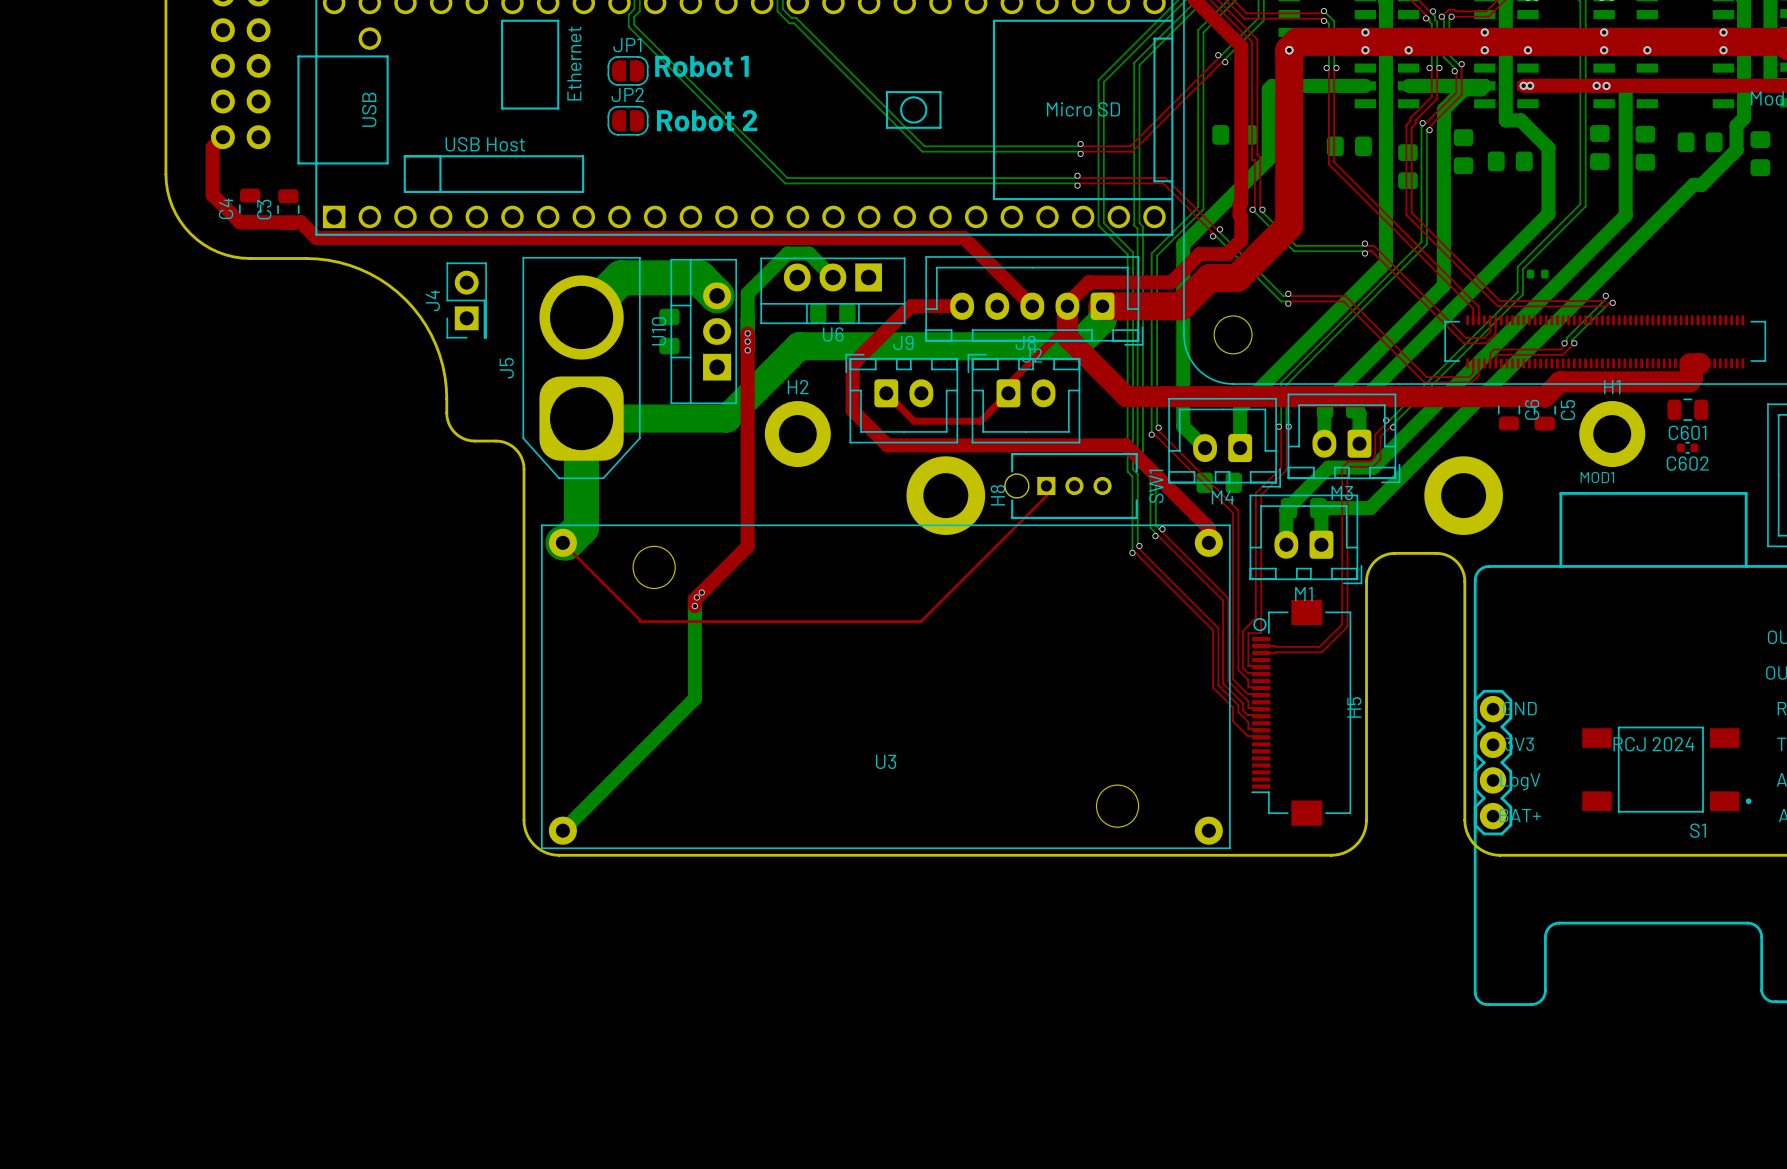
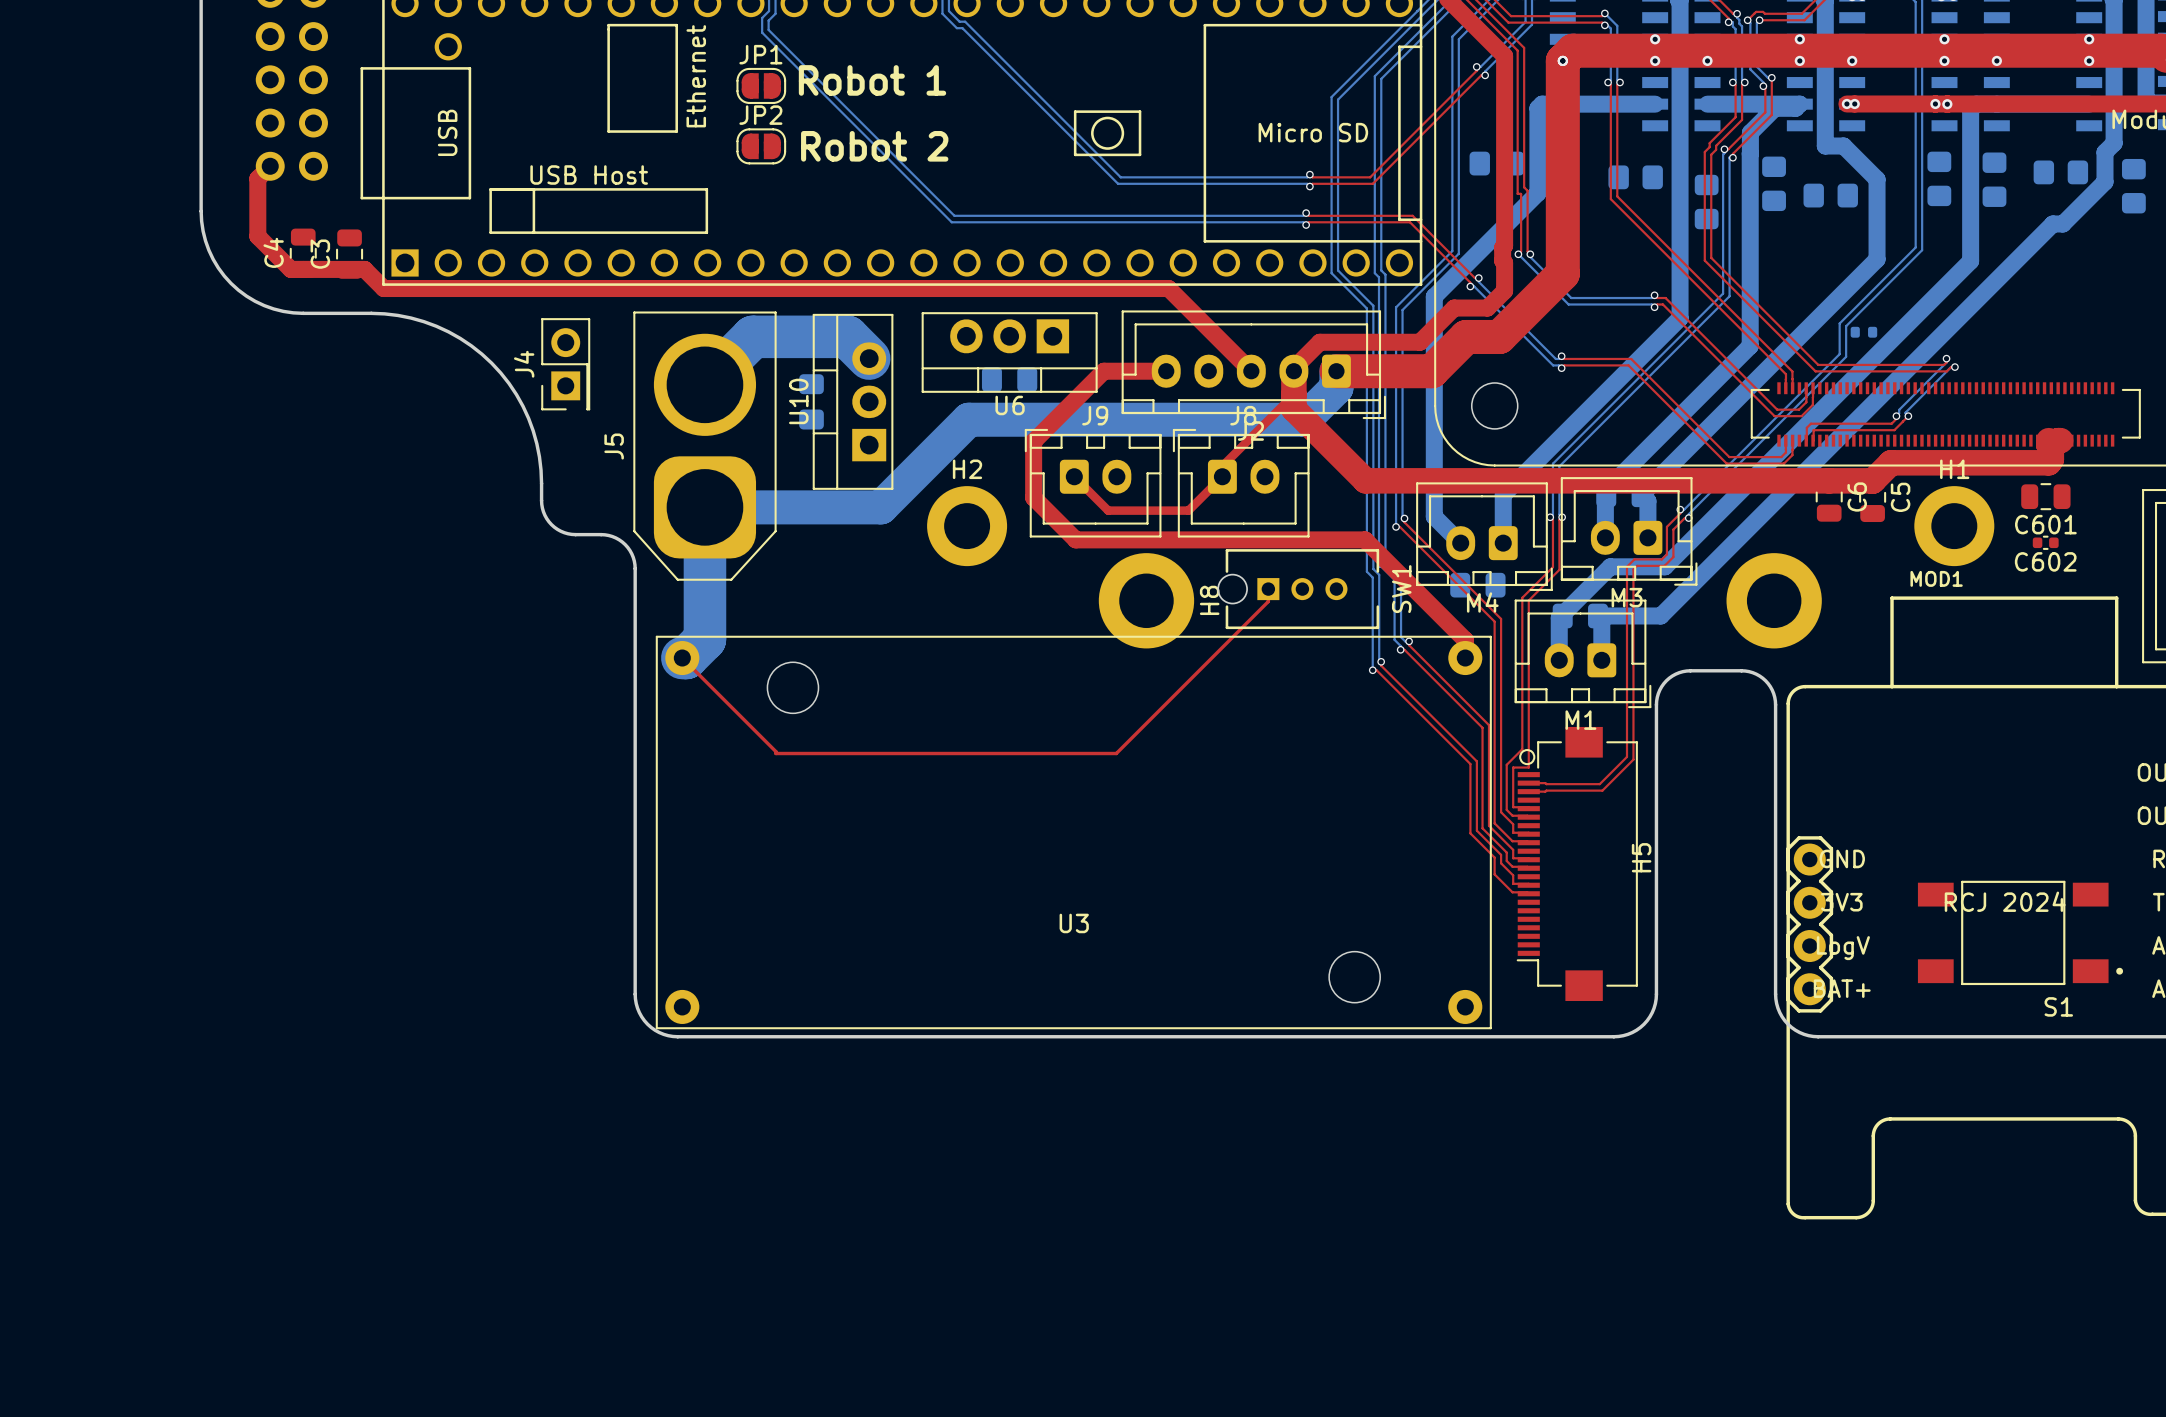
bottom track: (832, 277) (809, 253) (787, 253) (747, 293) (747, 350) -> none
top track: (747, 333) (747, 546) (694, 599) (694, 606) -> none
via: (747, 333) -> none
via: (747, 341) -> none
via: (747, 350) -> none
bottom track: (701, 592) (694, 599) (694, 698) (562, 830) -> none
via: (701, 592) -> none
via: (696, 597) -> none
via: (694, 606) -> none

